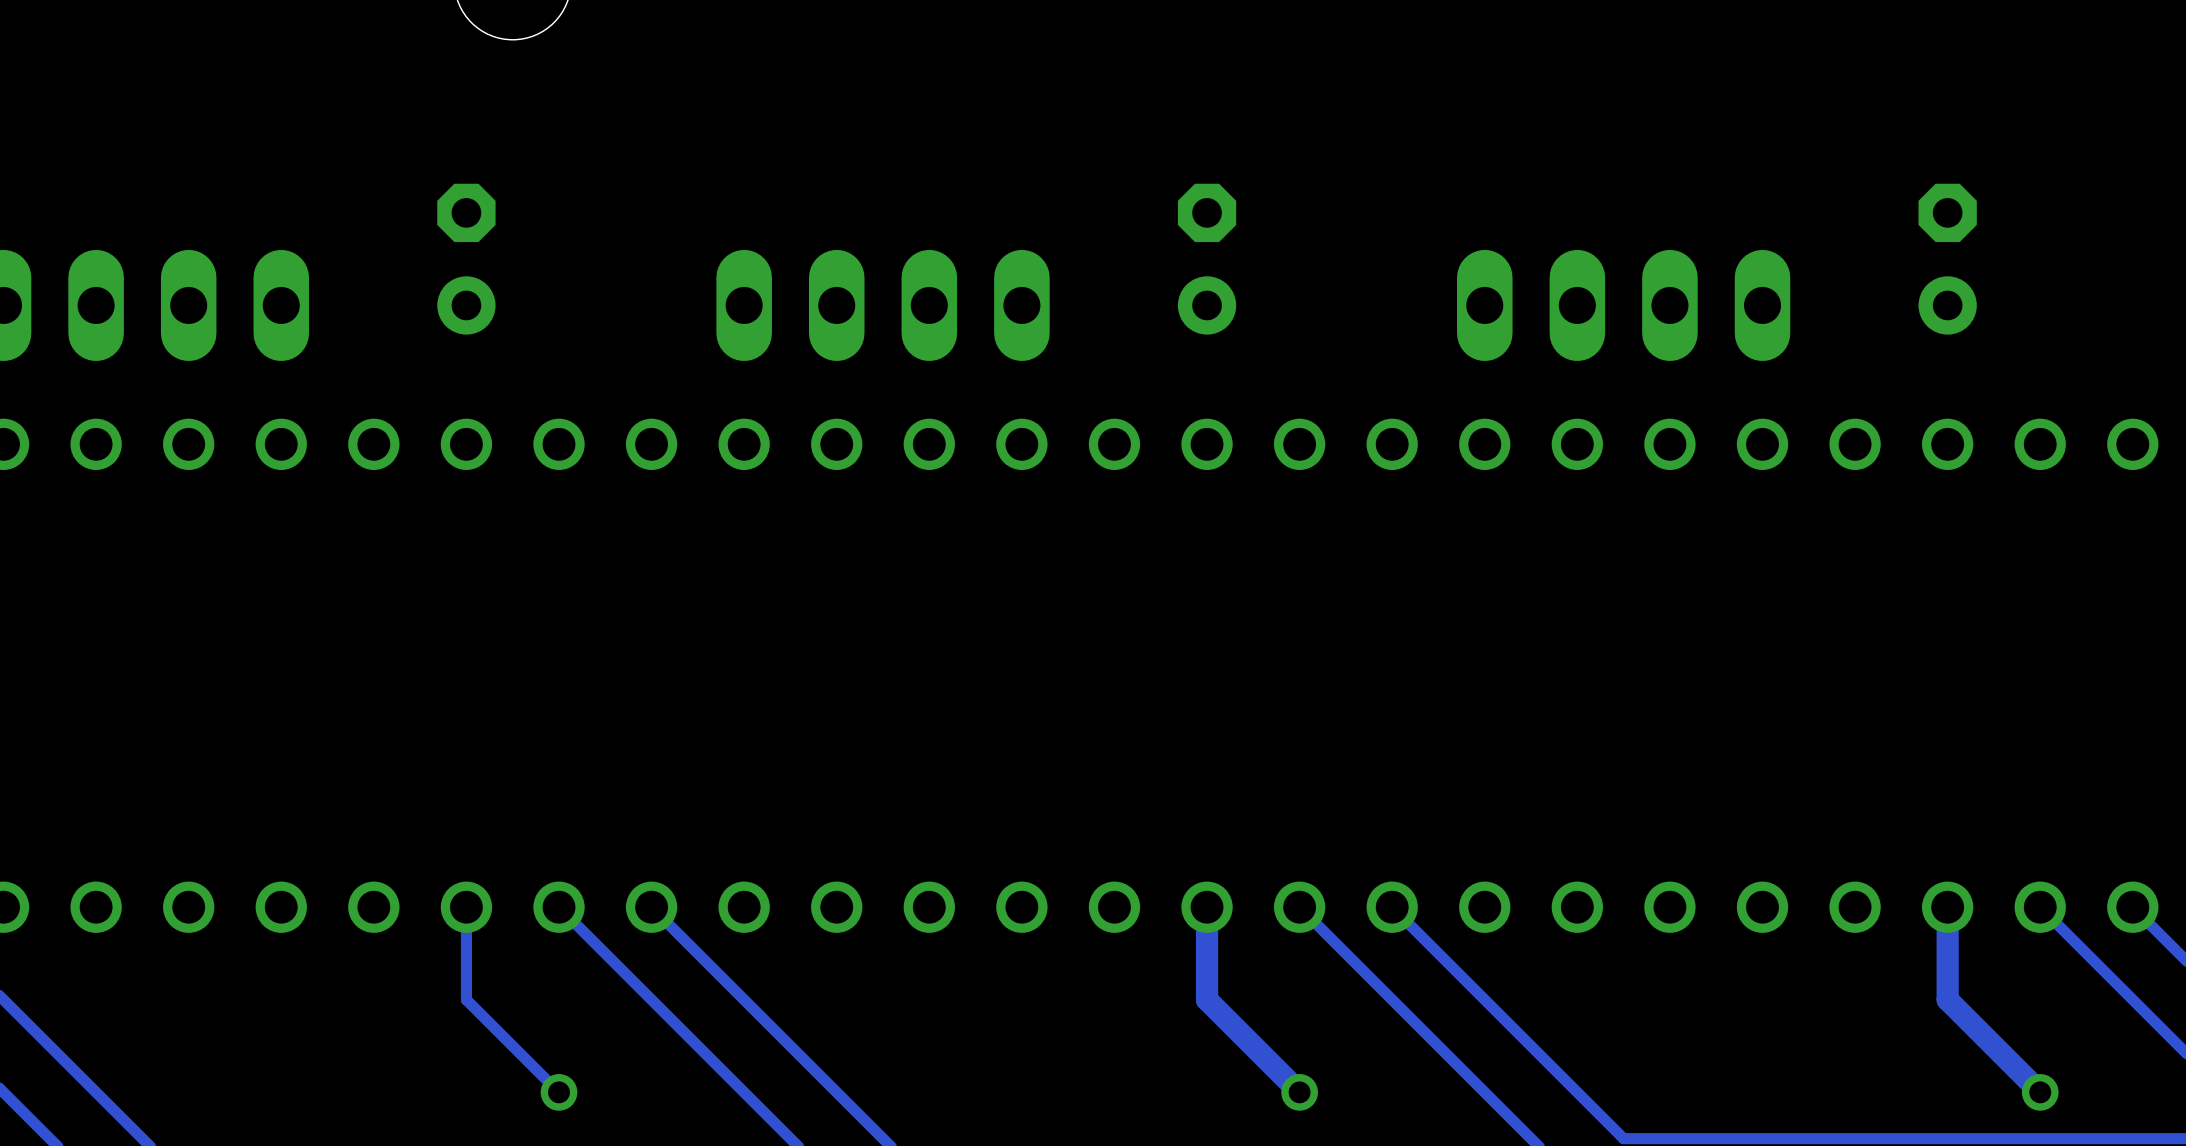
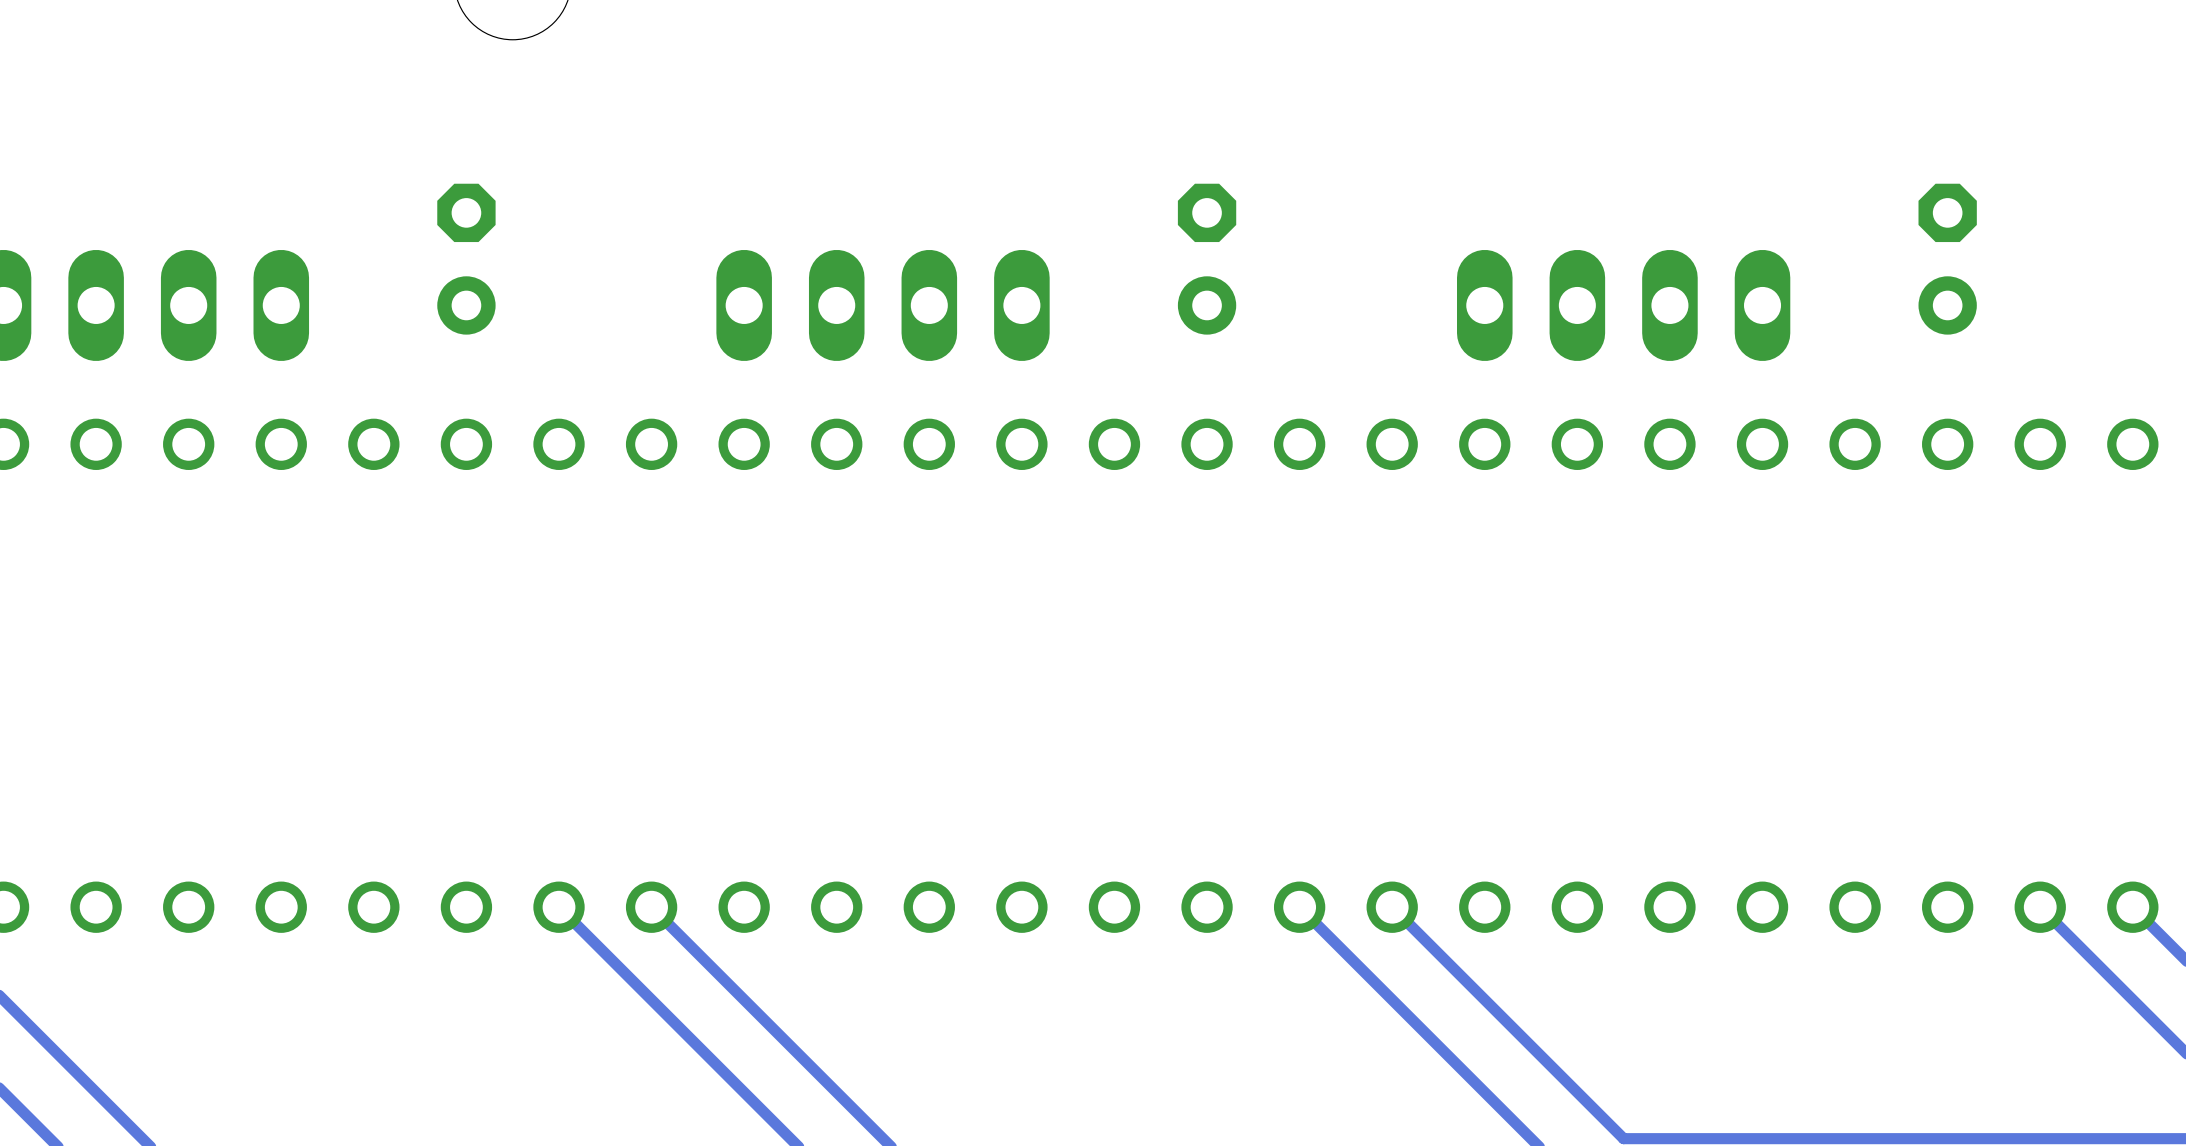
track: (466, 907) (466, 999) (559, 1092) -> none
track: (1207, 907) (1207, 999) (1299, 1092) -> none
track: (1947, 907) (1947, 999) (2040, 1092) -> none
via: (559, 1092) -> none
via: (1299, 1092) -> none
via: (2040, 1092) -> none

